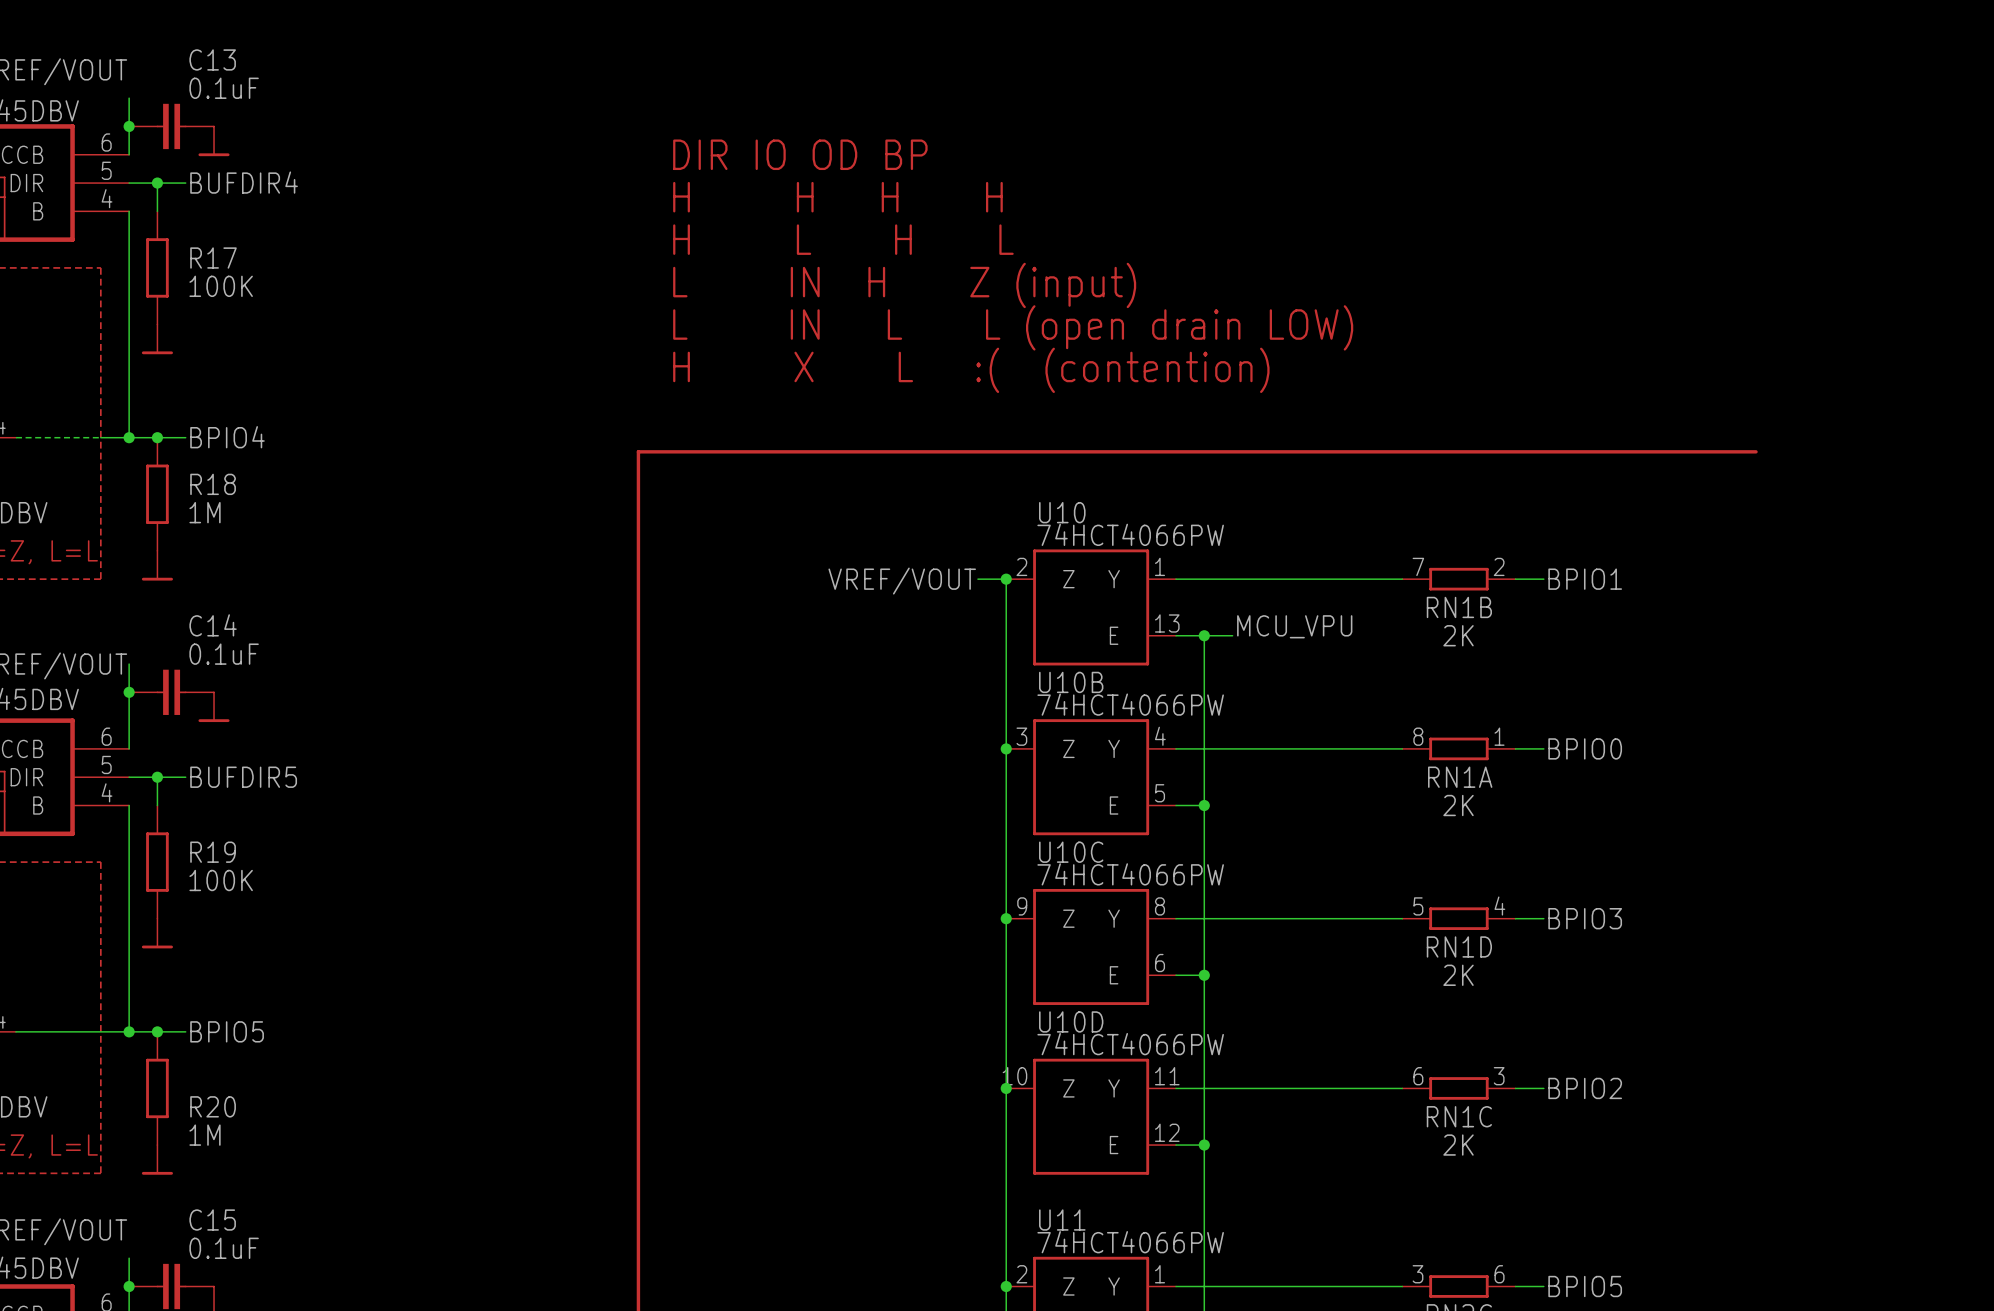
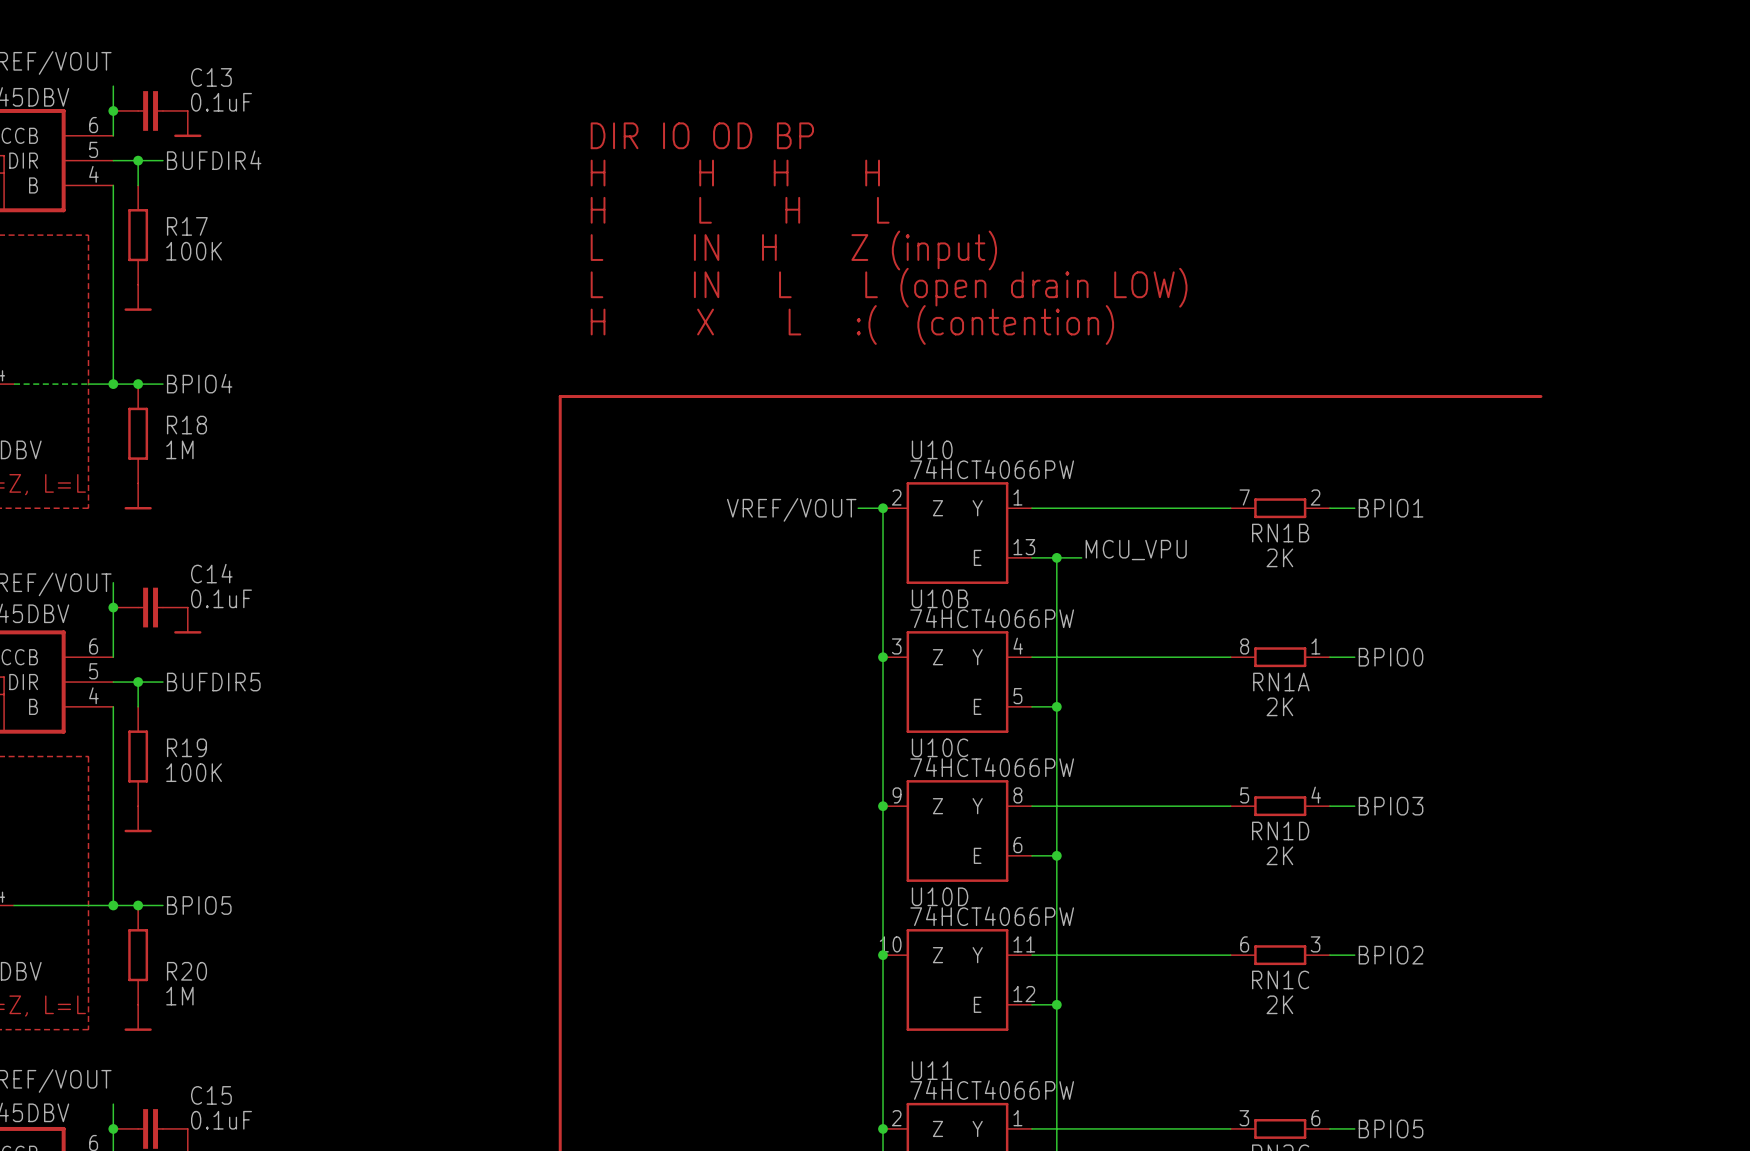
C13 name position: C13 (212, 59) -> C13 (211, 77)
C13 value position: 0.1uF (224, 88) -> 0.1uF (221, 102)
C14 name position: C14 (213, 625) -> C14 (211, 573)
C14 value position: 0.1uF (224, 654) -> 0.1uF (221, 598)
C15 name position: C15 (212, 1220) -> C15 (211, 1095)
C15 value position: 0.1uF (224, 1248) -> 0.1uF (221, 1120)

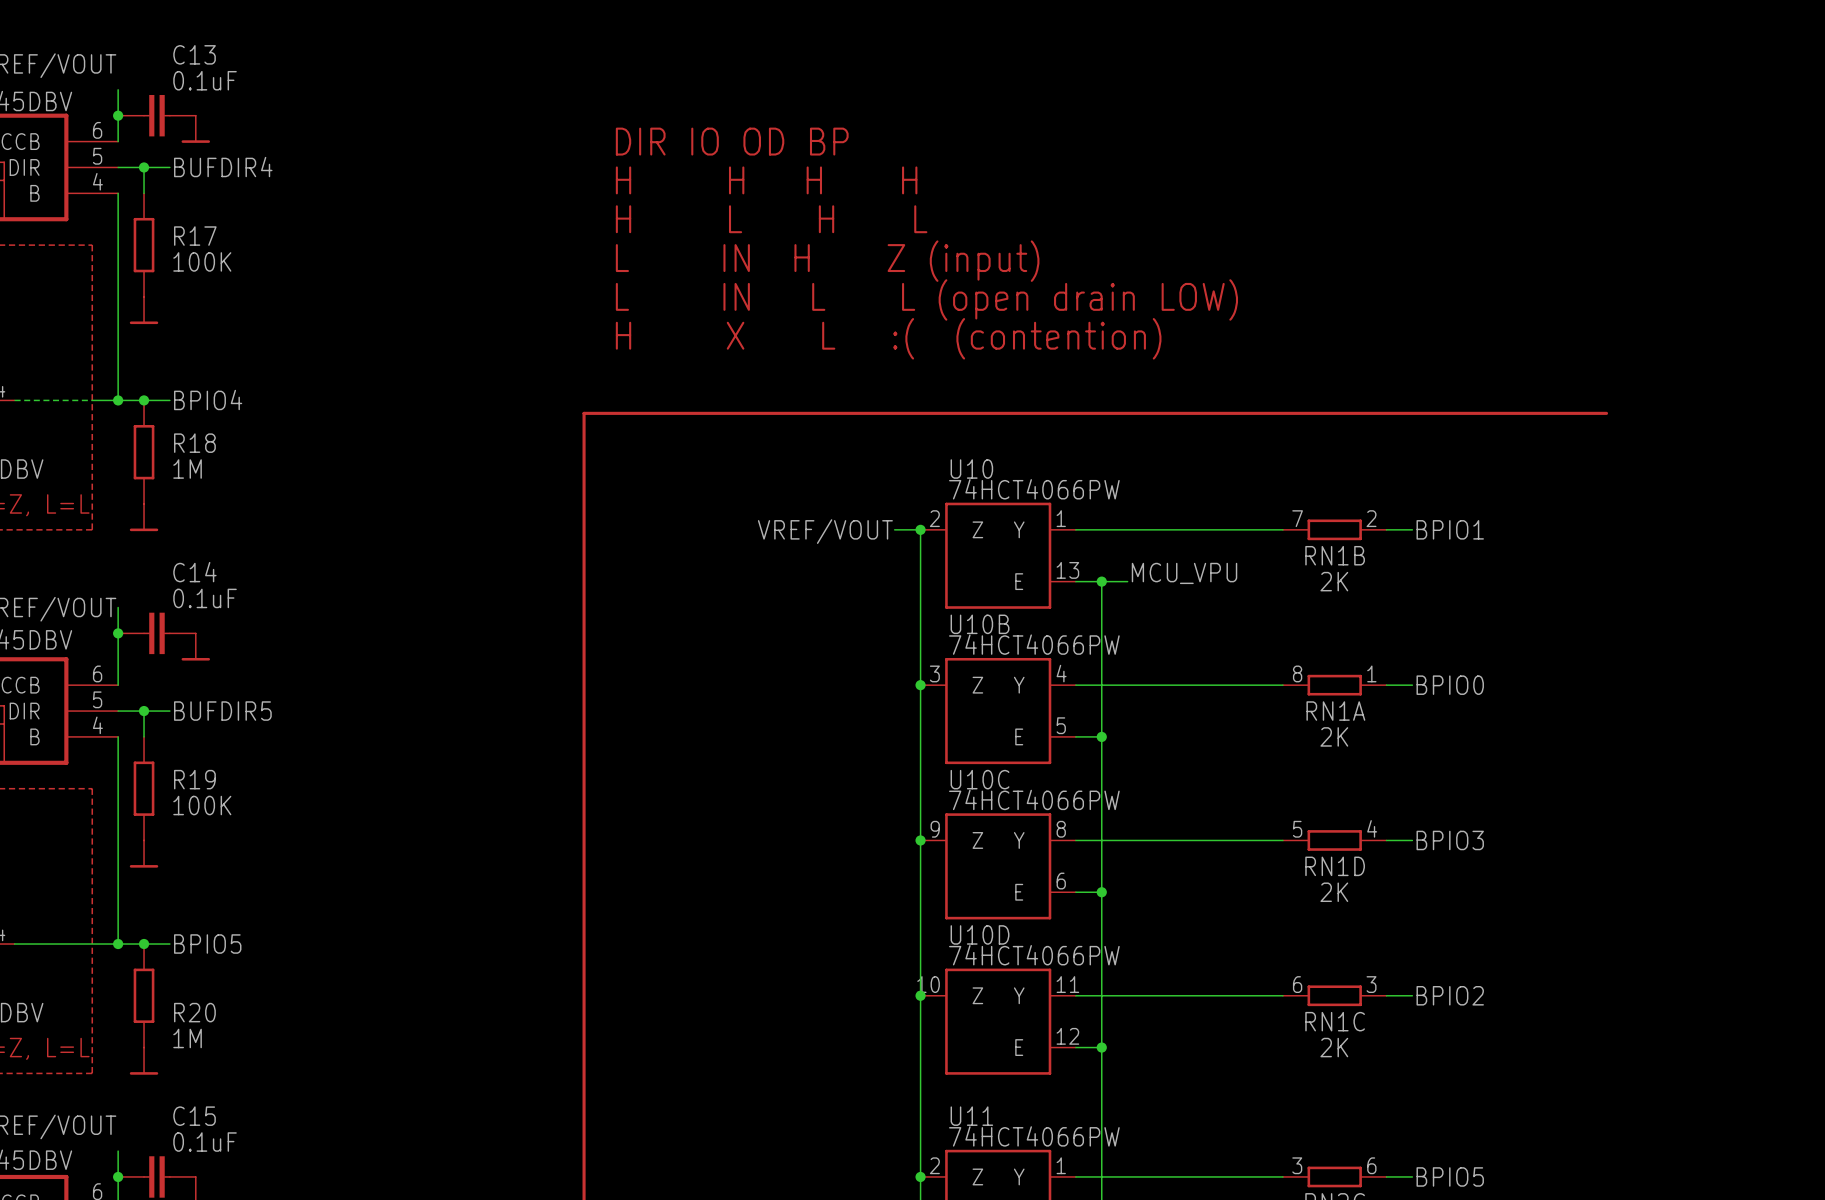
C13 name position: C13 (211, 77) -> C13 (194, 54)
C13 value position: 0.1uF (221, 102) -> 0.1uF (205, 80)
C14 name position: C14 (211, 573) -> C14 (194, 572)
C14 value position: 0.1uF (221, 598) -> 0.1uF (205, 598)
C15 name position: C15 (211, 1095) -> C15 (194, 1116)
C15 value position: 0.1uF (221, 1120) -> 0.1uF (205, 1142)

